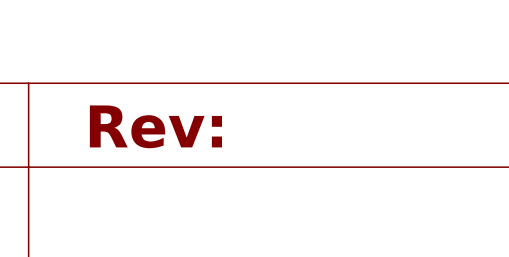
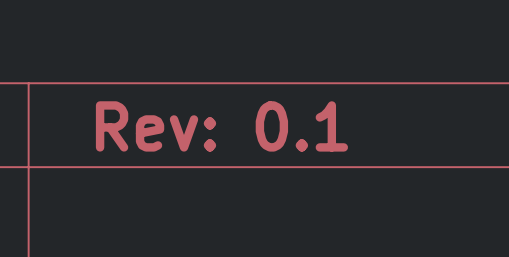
title block: Rev: (155, 126) -> Rev: 0.1 (221, 126)

